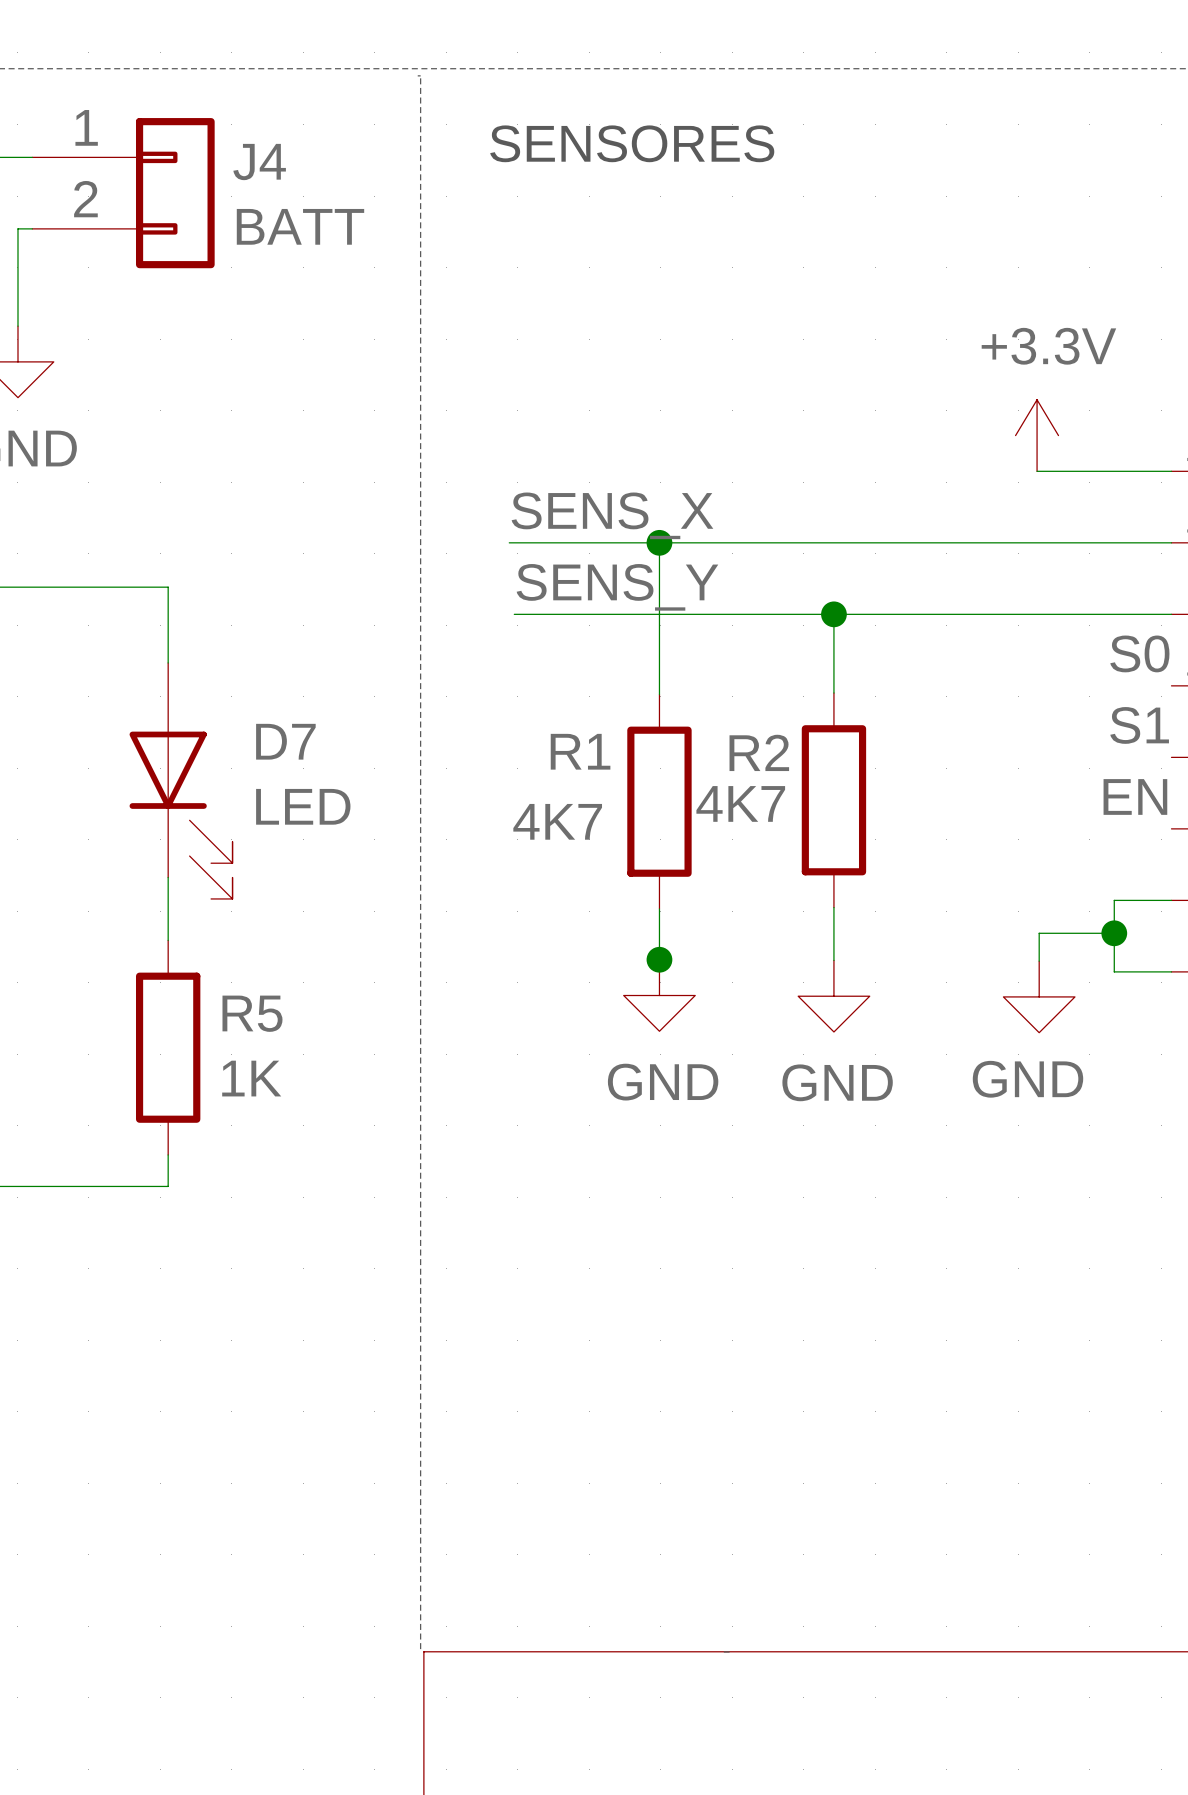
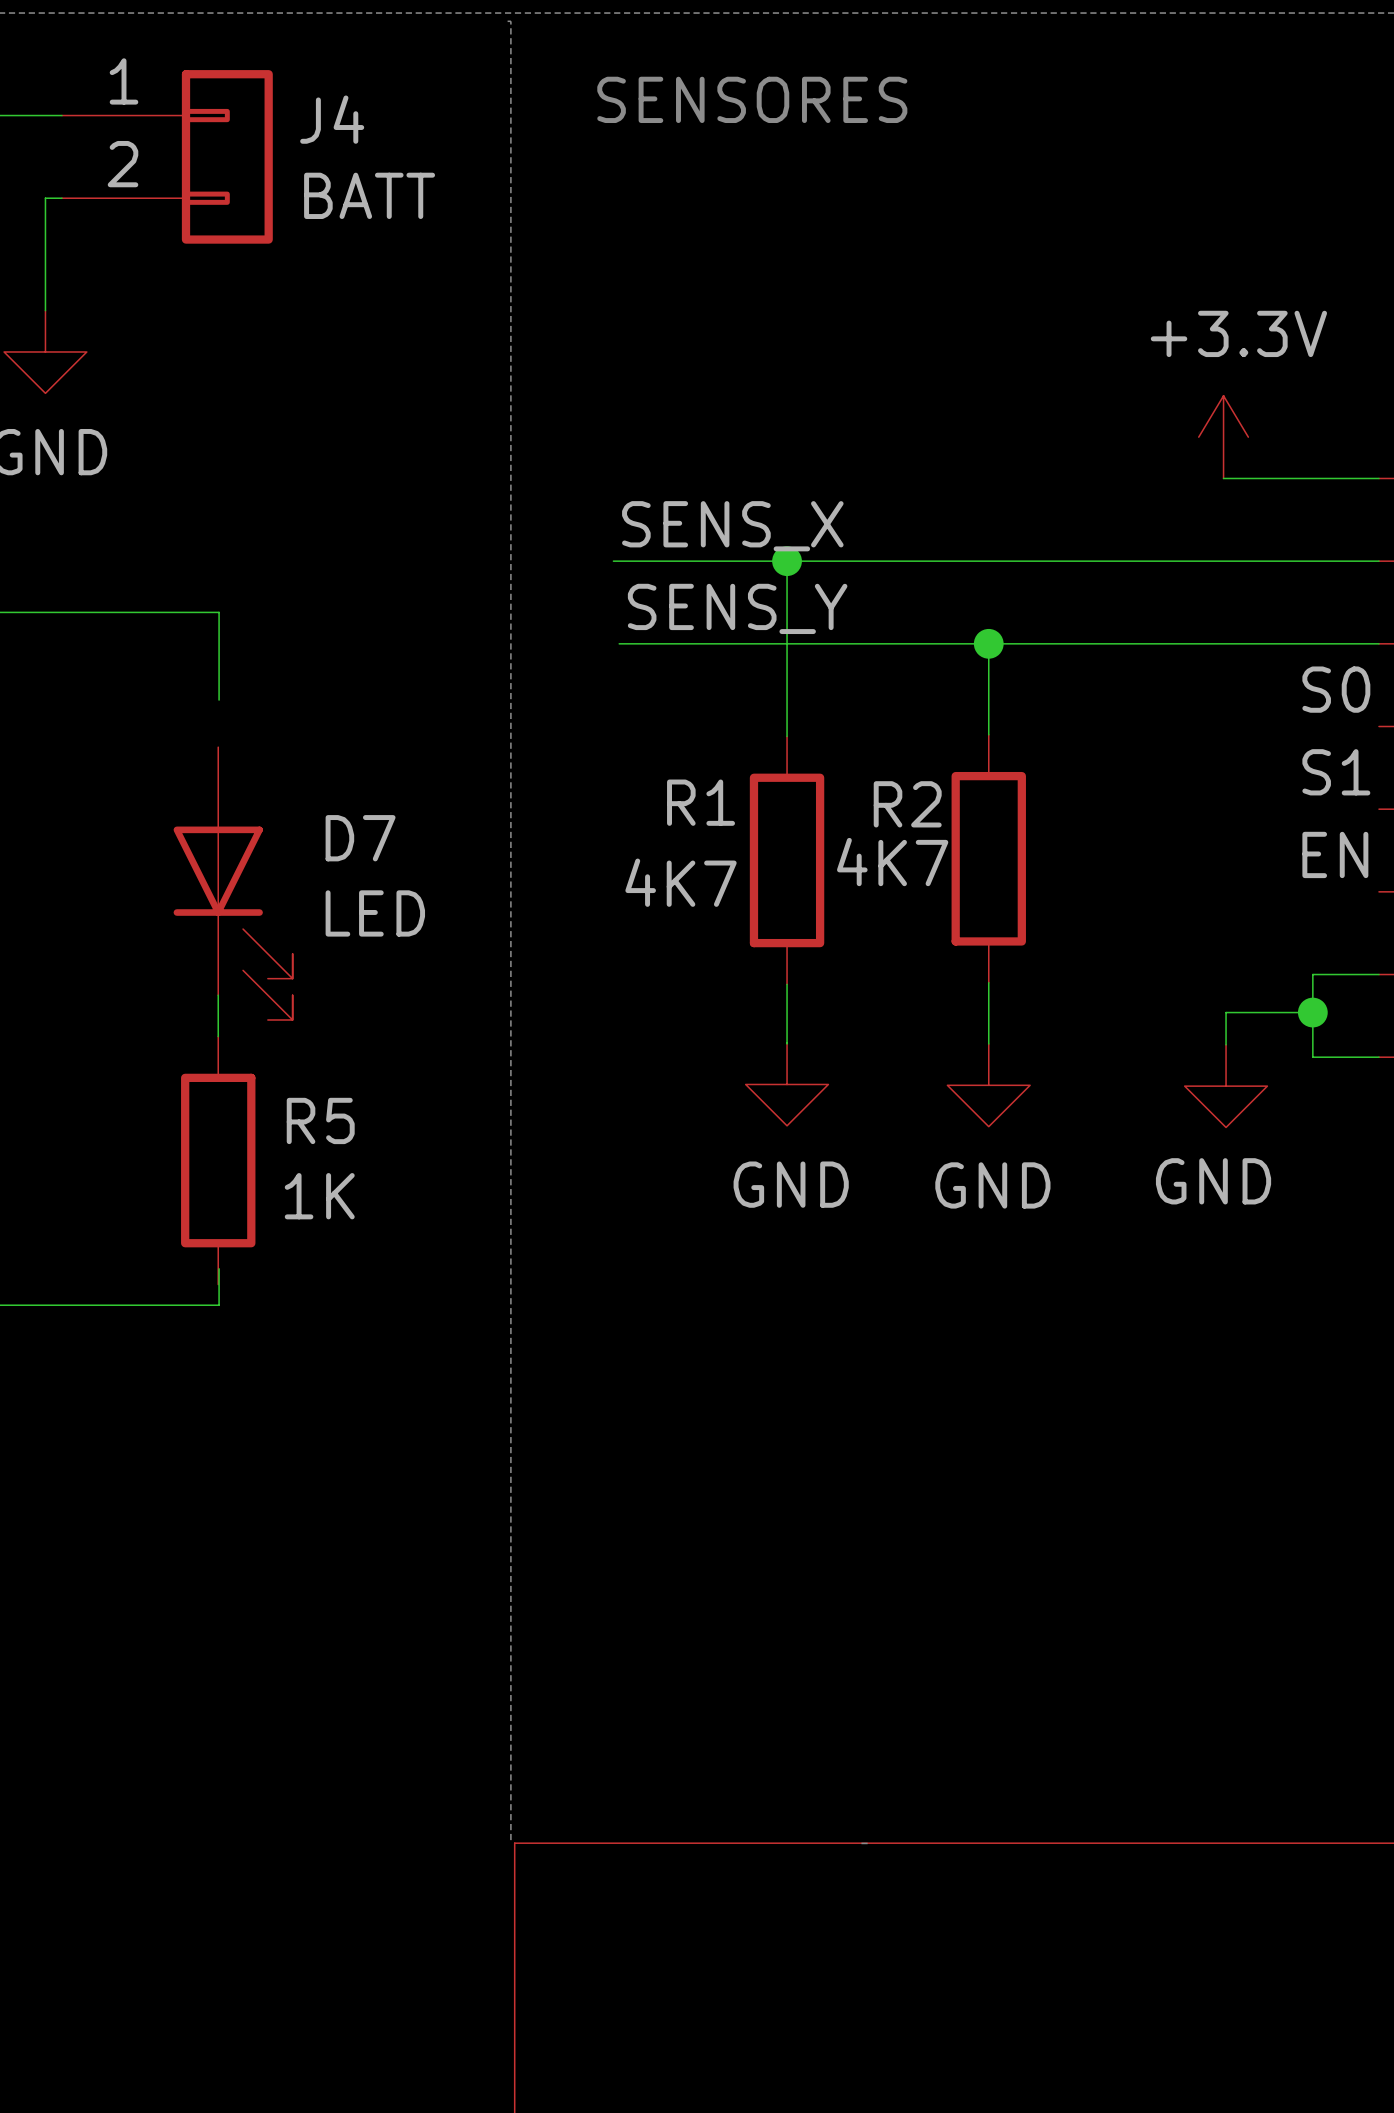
D7 position: (181, 780) -> (233, 883)
wire: (168, 877) (168, 940) -> none
wire: none -> (218, 995) (218, 1036)
junction: (659, 959) -> none
R5 position: (168, 1047) -> (218, 1160)

